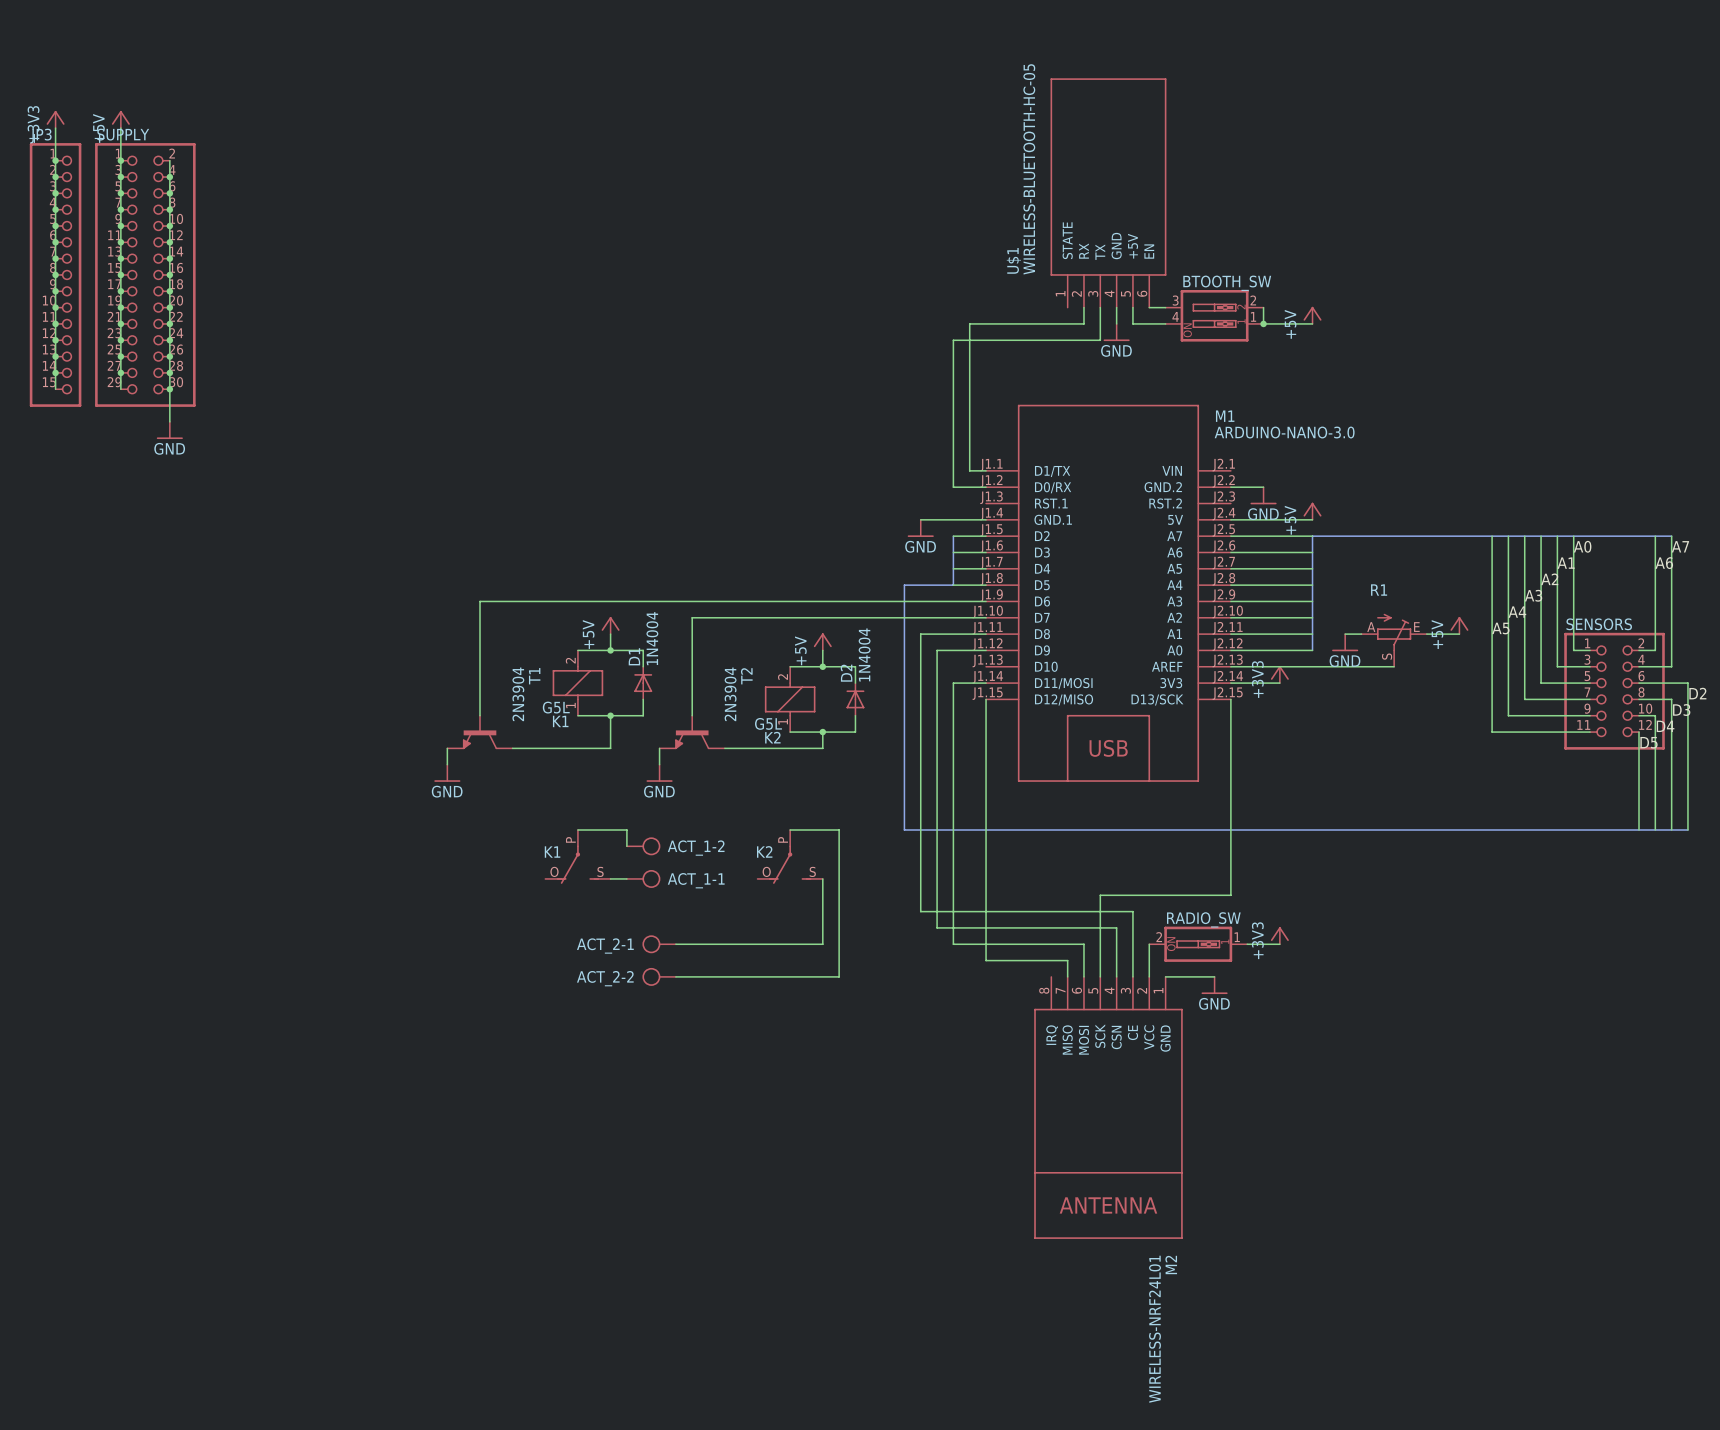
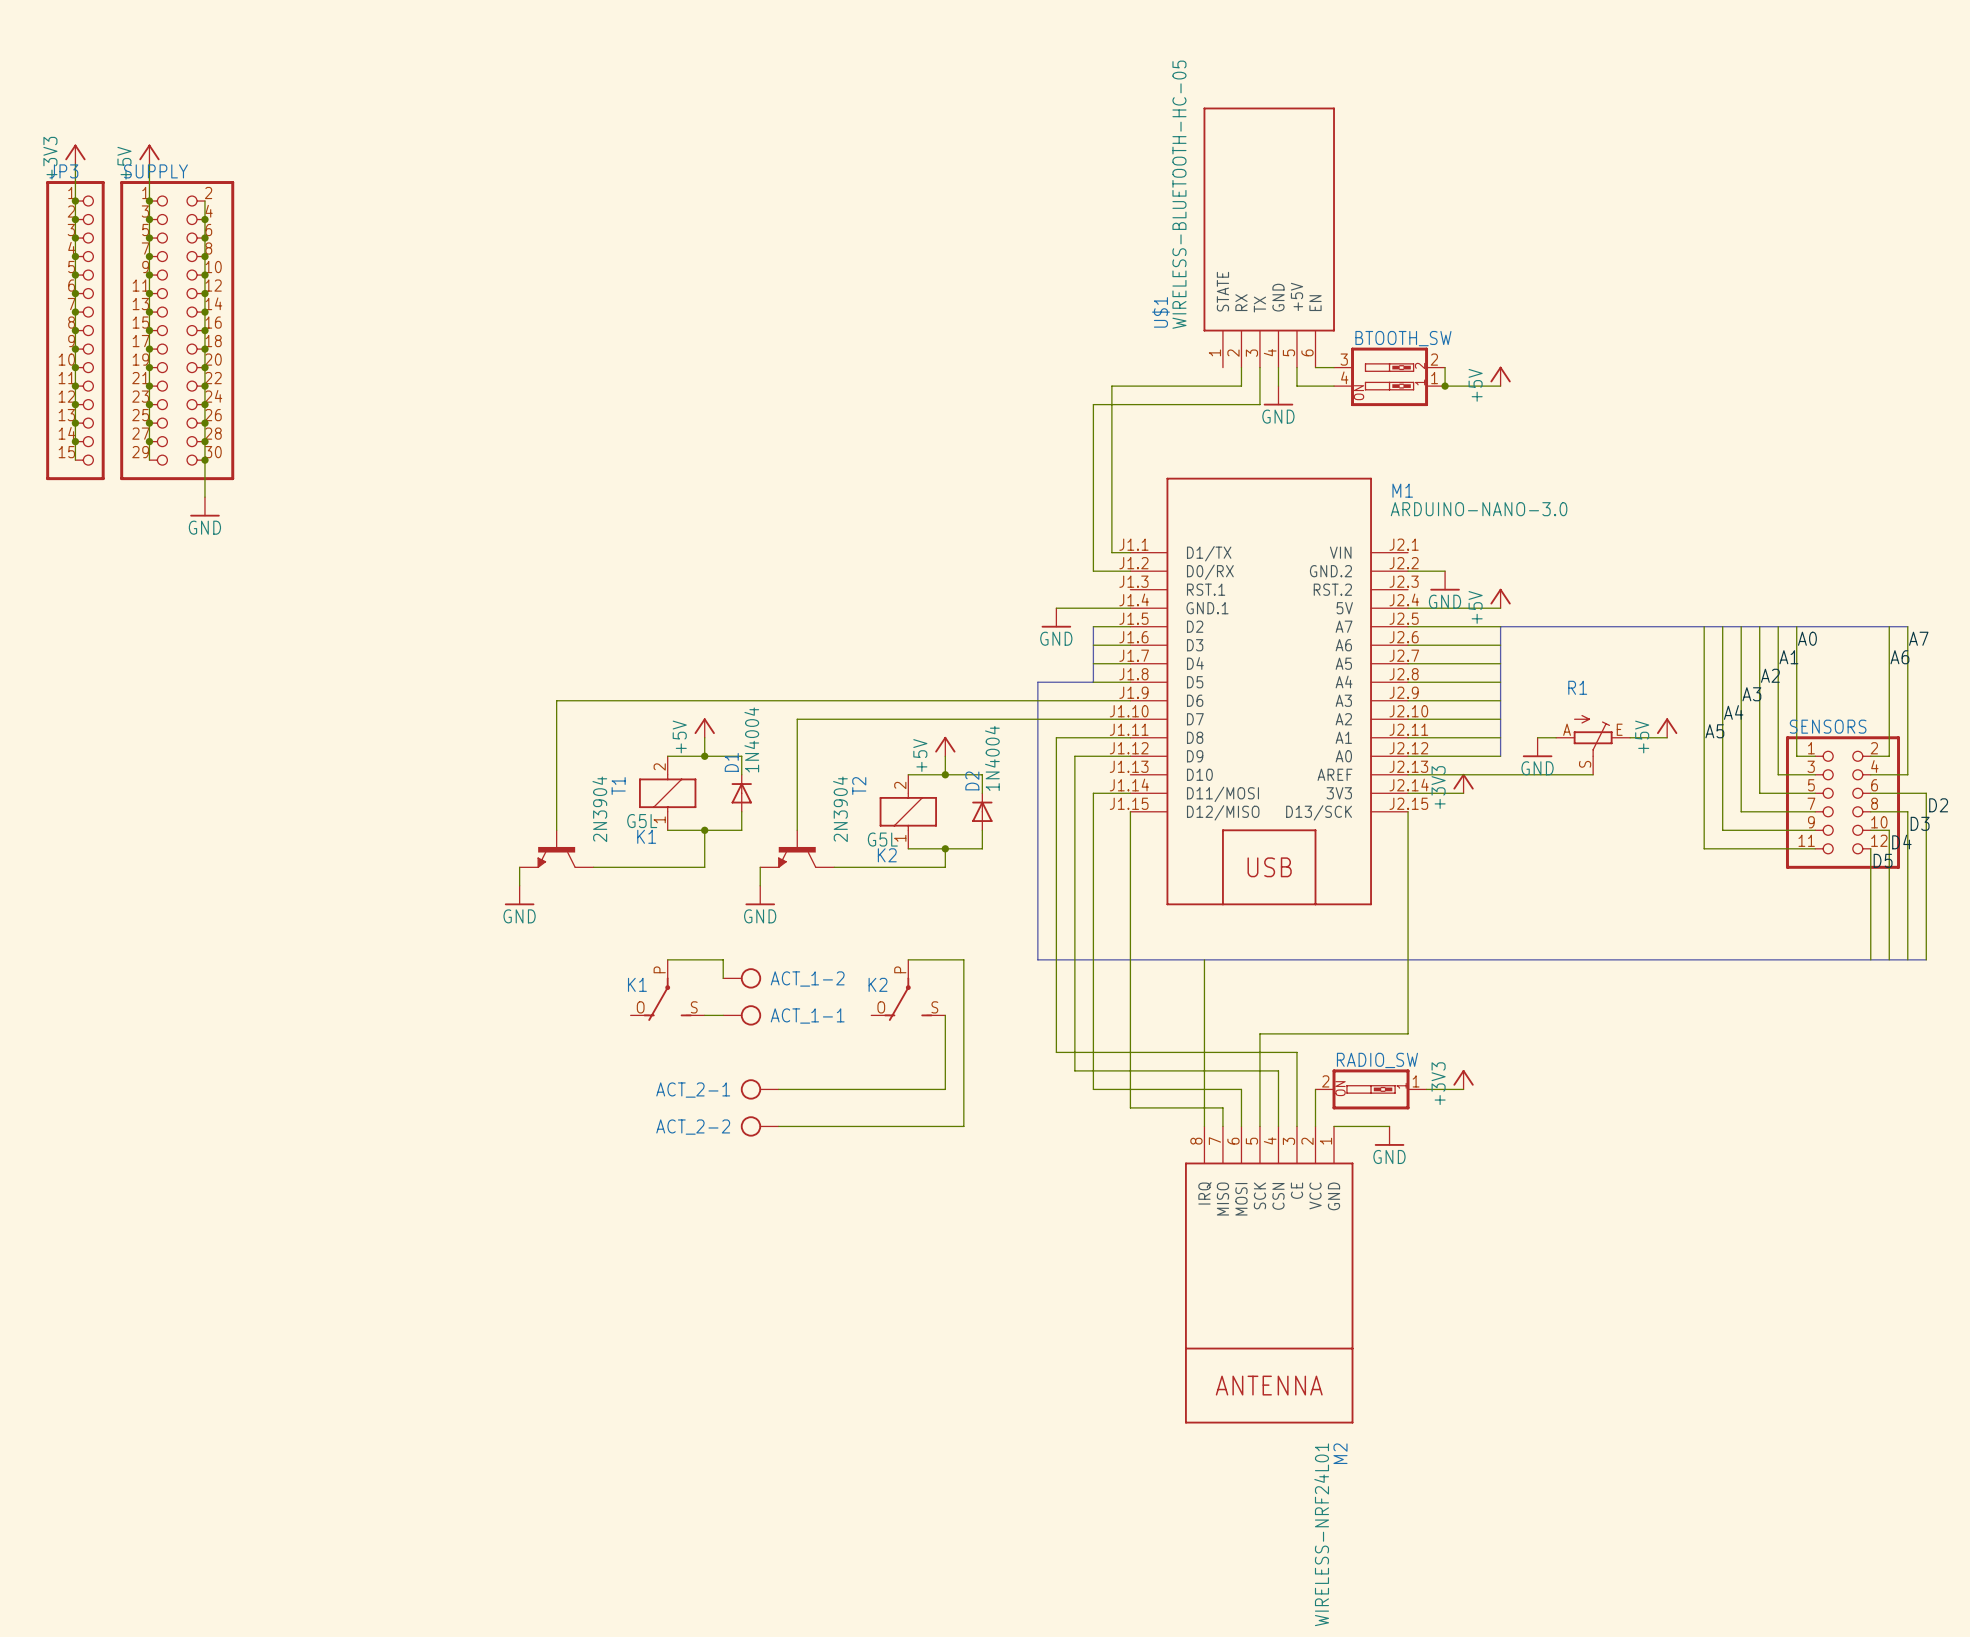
wire: none -> (1204, 959) (1204, 1126)

